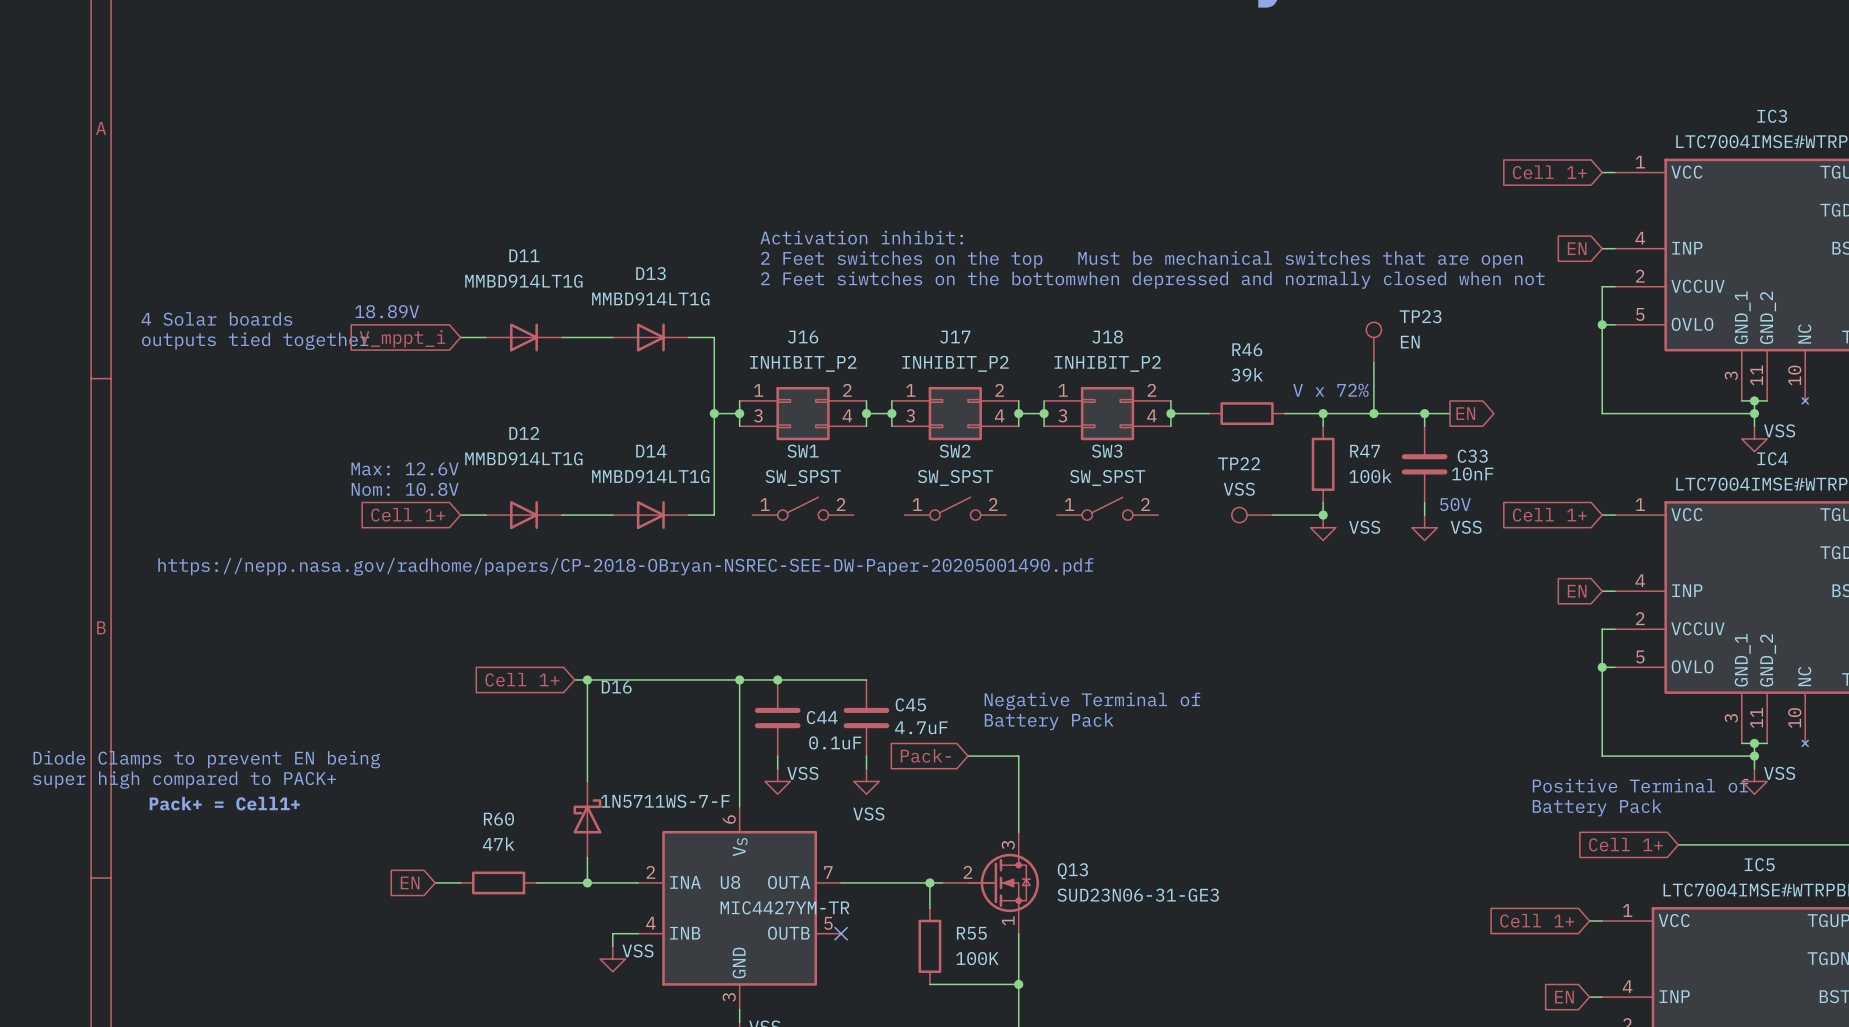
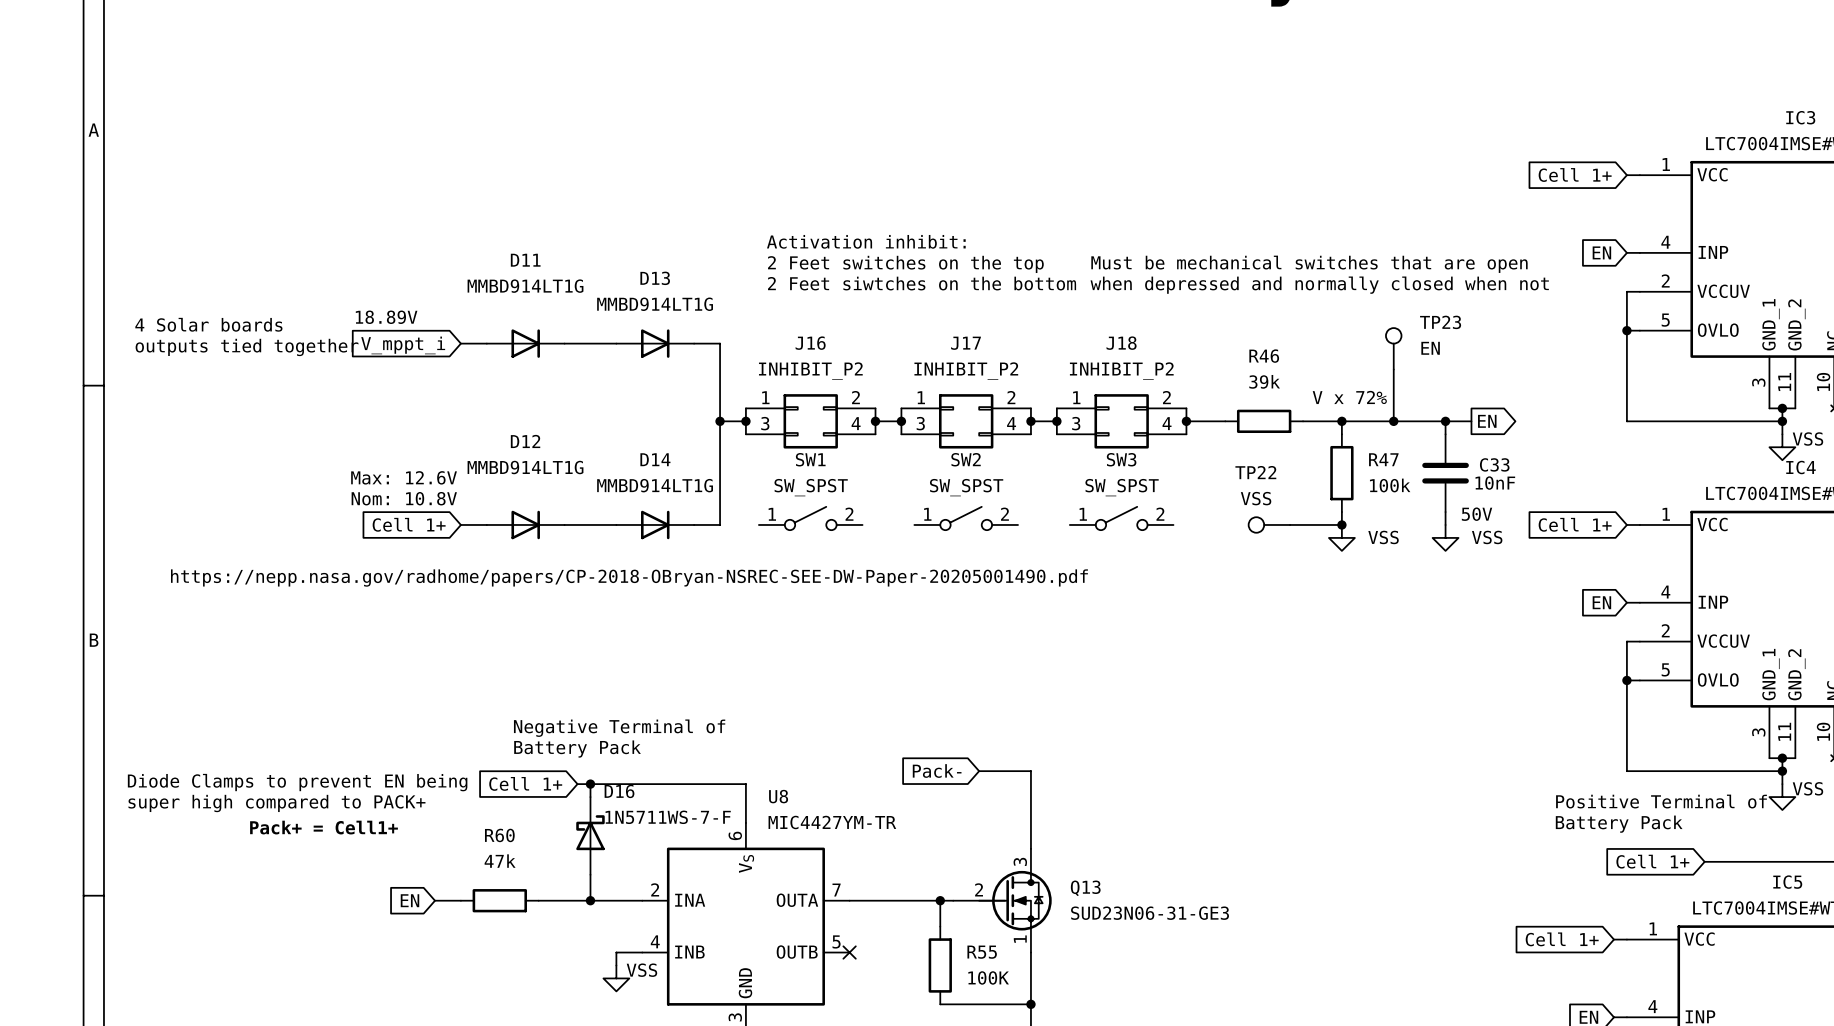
global label position: Cell 1+ (522, 679) -> Cell 1+ (525, 783)
wire: (574, 679) (866, 679) -> none
wire: (587, 679) (587, 768) -> none
junction: (587, 679) -> none
wire: (739, 679) (739, 768) -> (577, 784) (745, 784)
junction: (739, 679) -> none
junction: (777, 679) -> none
D16 name position: D16 (616, 687) -> D16 (619, 791)
text: Negative Terminal of (1092, 701) -> none
text: none -> Negative Terminal of (619, 728)
C44: 0.1uF (777, 718) -> none
C45: 4.7uF (866, 718) -> none
text: Battery Pack (1049, 721) -> none
text: none -> Battery Pack (577, 749)
wire: (777, 756) (777, 768) -> none
wire: (866, 756) (866, 768) -> none
text position: Diode Clamps to prevent EN being (206, 759) -> Diode Clamps to prevent EN being (297, 782)
junction: none -> (590, 784)
text position: super high compared to PACK+ (184, 780) -> super high compared to PACK+ (276, 803)
power symbol: VSS (777, 781) -> none
power symbol: VSS (866, 781) -> none
text position: Pack+ = Cell1+ (224, 803) -> Pack+ = Cell1+ (324, 827)
U8 name position: U8 (730, 882) -> U8 (778, 796)
U8 value position: MIC4427YM-TR (784, 907) -> MIC4427YM-TR (832, 822)

